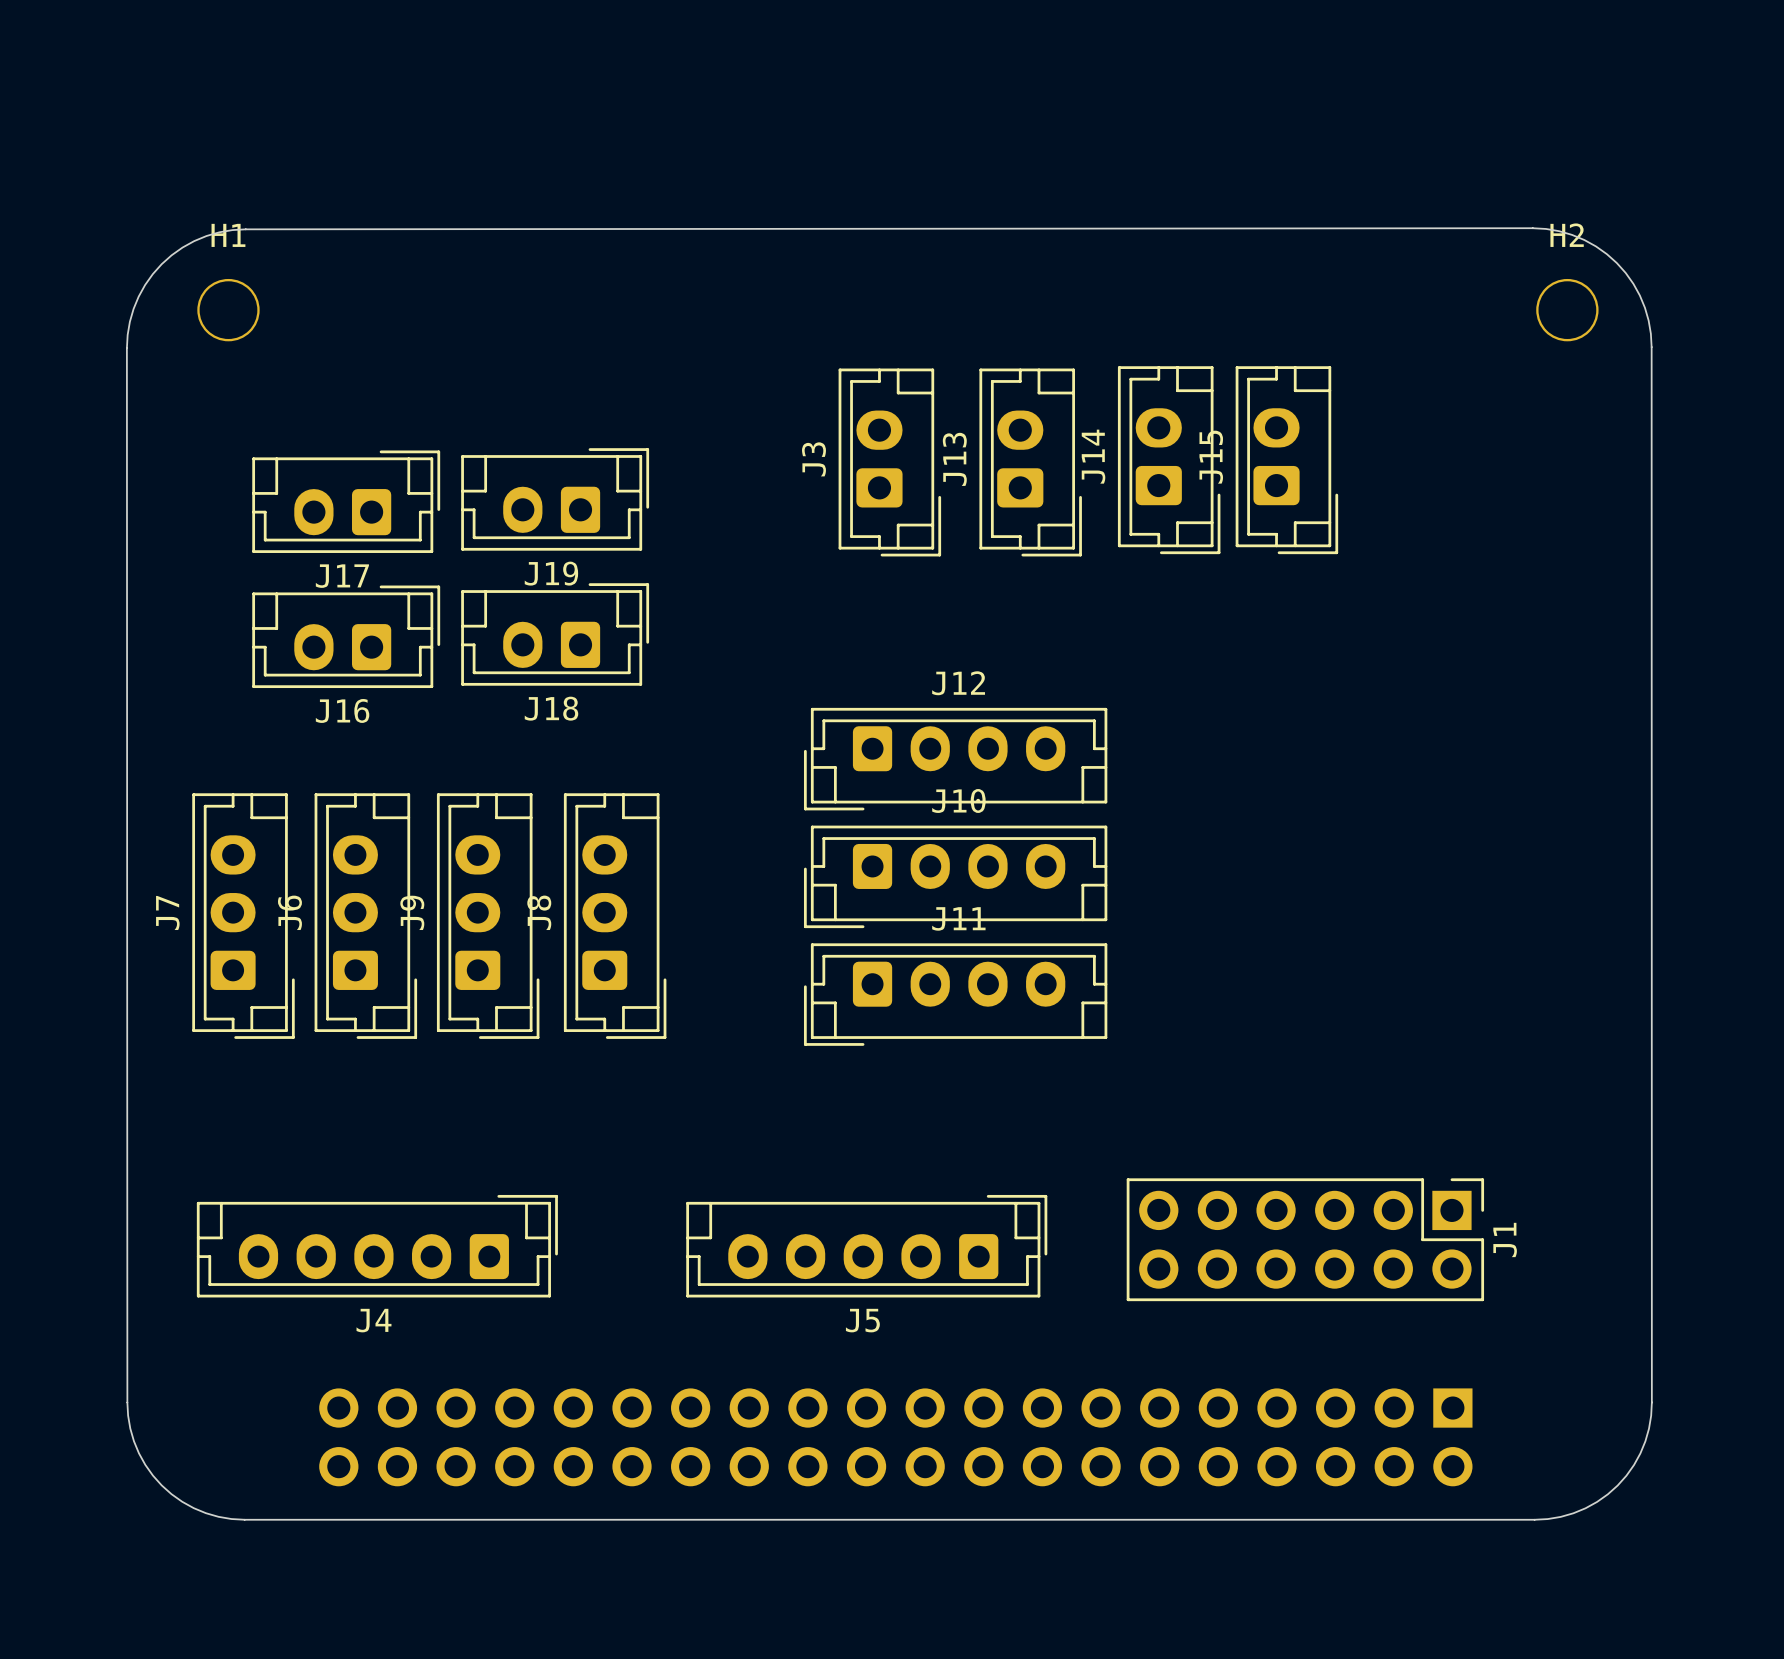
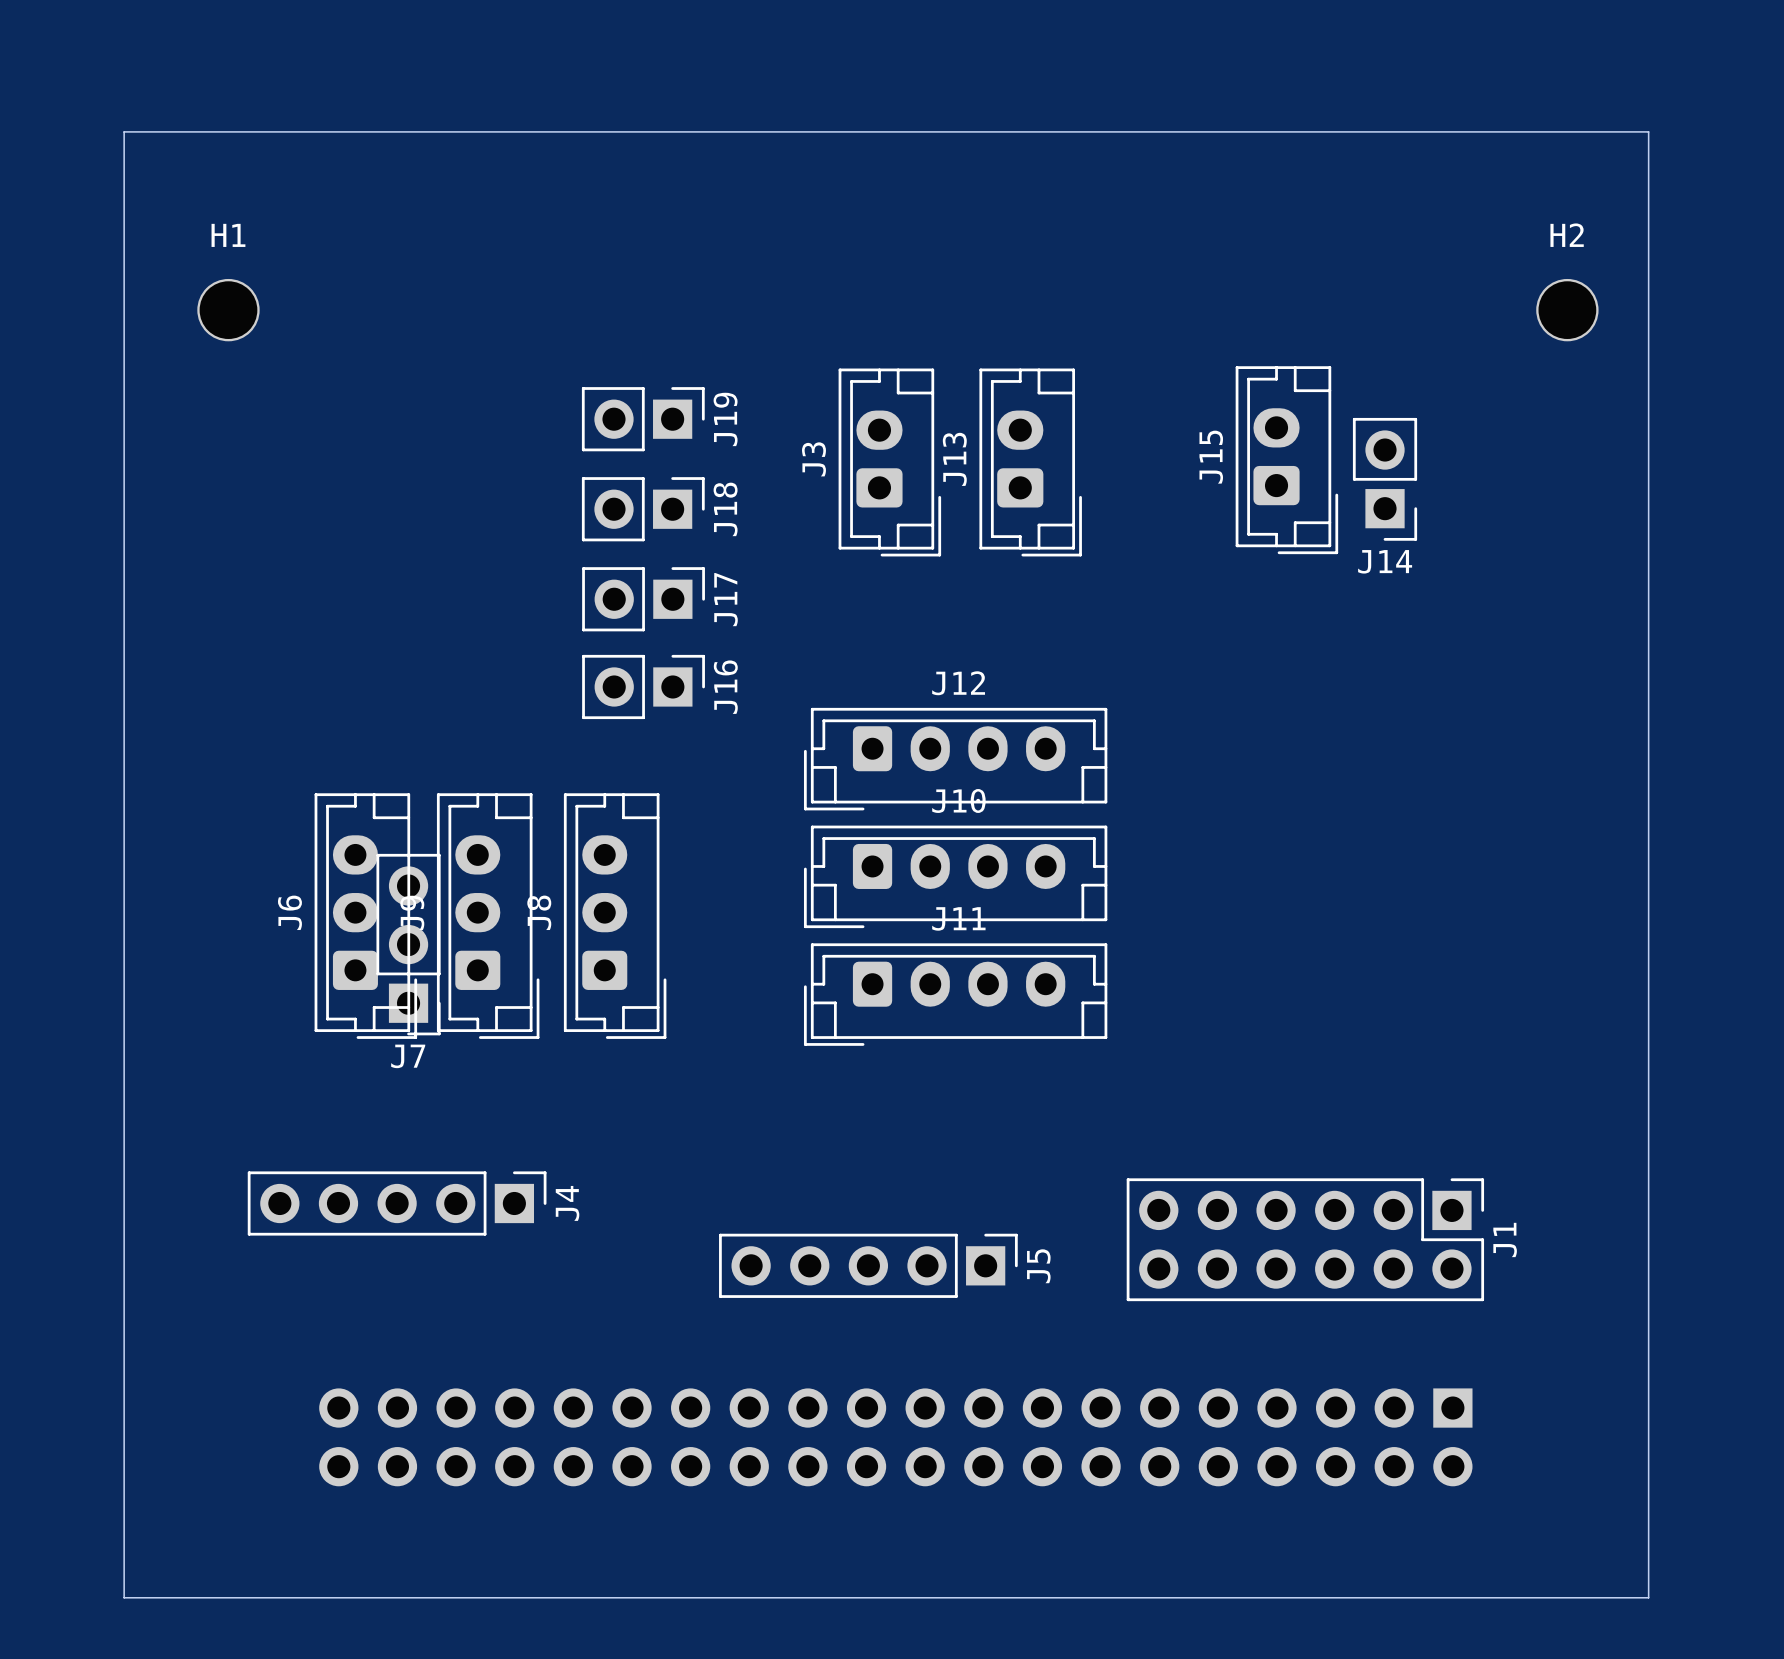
board edge: (1532, 228) (245, 229) (219, 232) (194, 241) (161, 264) (145, 284) (133, 308) (126, 348) (127, 1402) (130, 1428) (138, 1453) (161, 1485) (193, 1508) (218, 1516) (244, 1519) (1534, 1519) (1560, 1516) (1585, 1508) (1617, 1485) (1640, 1453) (1649, 1428) (1651, 1402) (1650, 333) (1639, 295) (1616, 263) (1596, 246) (1572, 234) (1532, 228) -> (124, 131) (124, 1597) (1648, 1597) (1648, 131) (124, 131)
J14 footprint: [1117, 366, 1221, 555] -> [1352, 417, 1418, 541]
J19 footprint: [461, 448, 650, 551] -> [581, 387, 705, 452]
J17 footprint: [252, 450, 441, 553] -> [582, 567, 705, 632]
J14 name position: J14 (1093, 456) -> J14 (1385, 561)
J19 name position: J19 (551, 573) -> J19 (725, 419)
J17 name position: J17 (342, 576) -> J17 (726, 599)
J18 footprint: [461, 583, 650, 686] -> [581, 477, 705, 542]
J16 footprint: [252, 585, 441, 689] -> [582, 654, 705, 720]
J18 name position: J18 (551, 708) -> J18 (725, 509)
J16 name position: J16 (342, 710) -> J16 (725, 687)
J7 footprint: [192, 793, 295, 1039] -> [376, 853, 441, 1036]
J7 name position: J7 (167, 912) -> J7 (408, 1056)
J4 footprint: [196, 1194, 558, 1298] -> [247, 1171, 547, 1236]
J5 footprint: [686, 1194, 1048, 1298] -> [719, 1233, 1018, 1298]
J4 name position: J4 (374, 1320) -> J4 (567, 1203)
J5 name position: J5 (862, 1320) -> J5 (1038, 1266)

